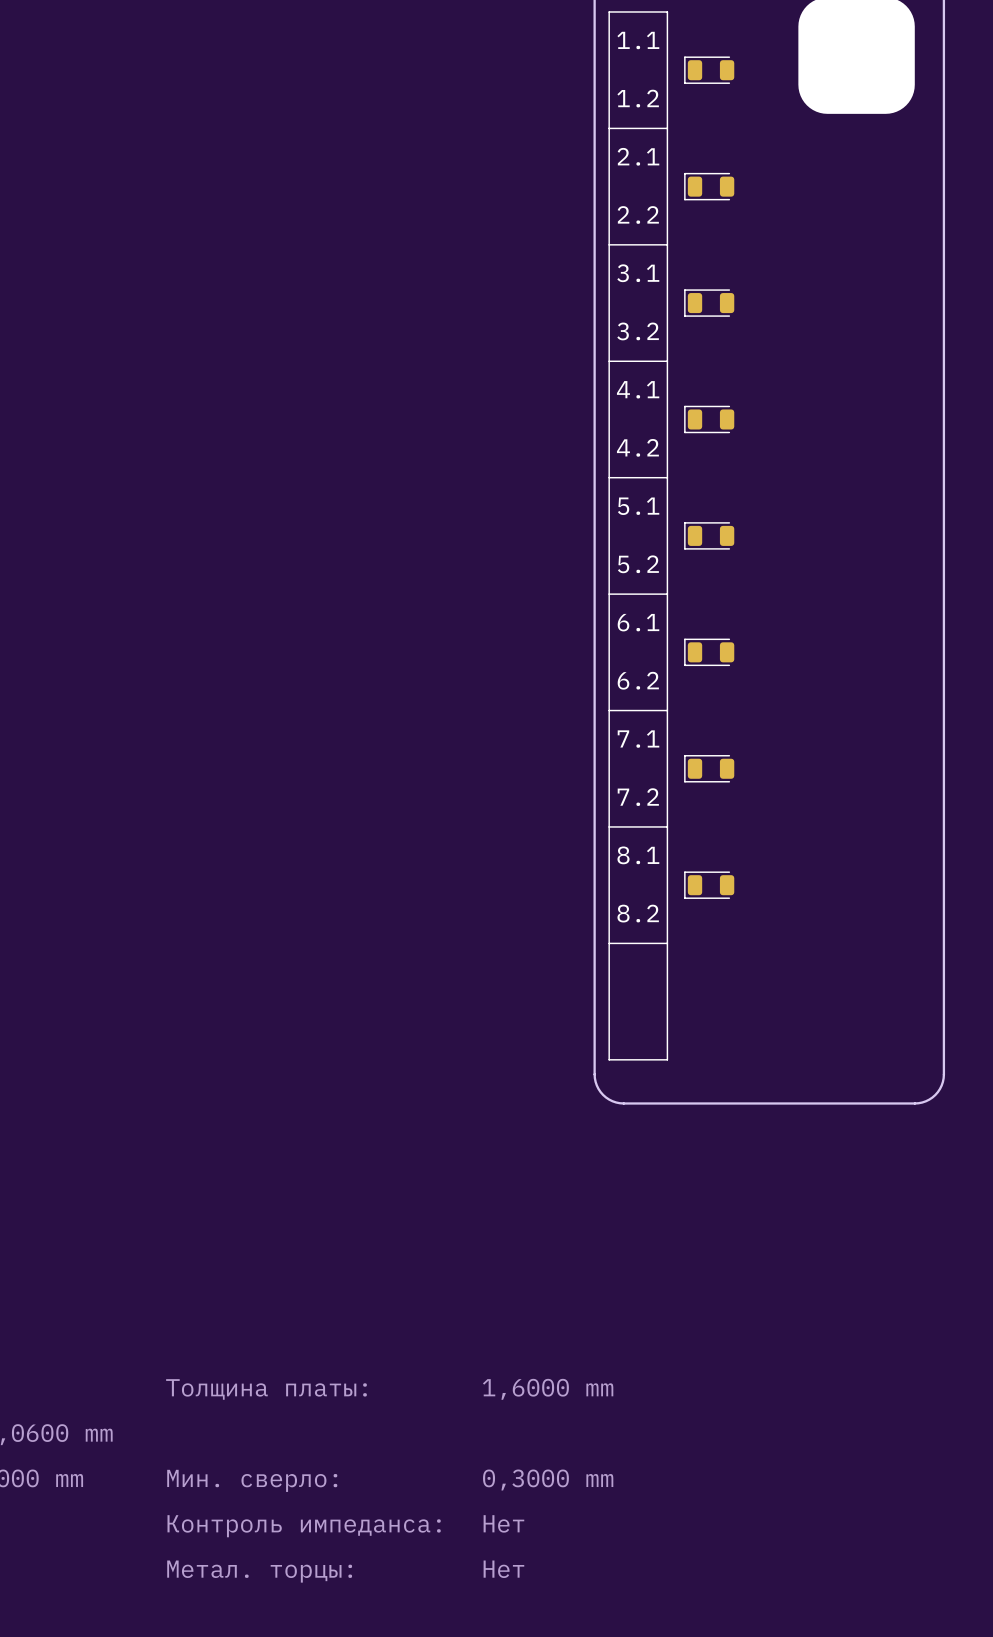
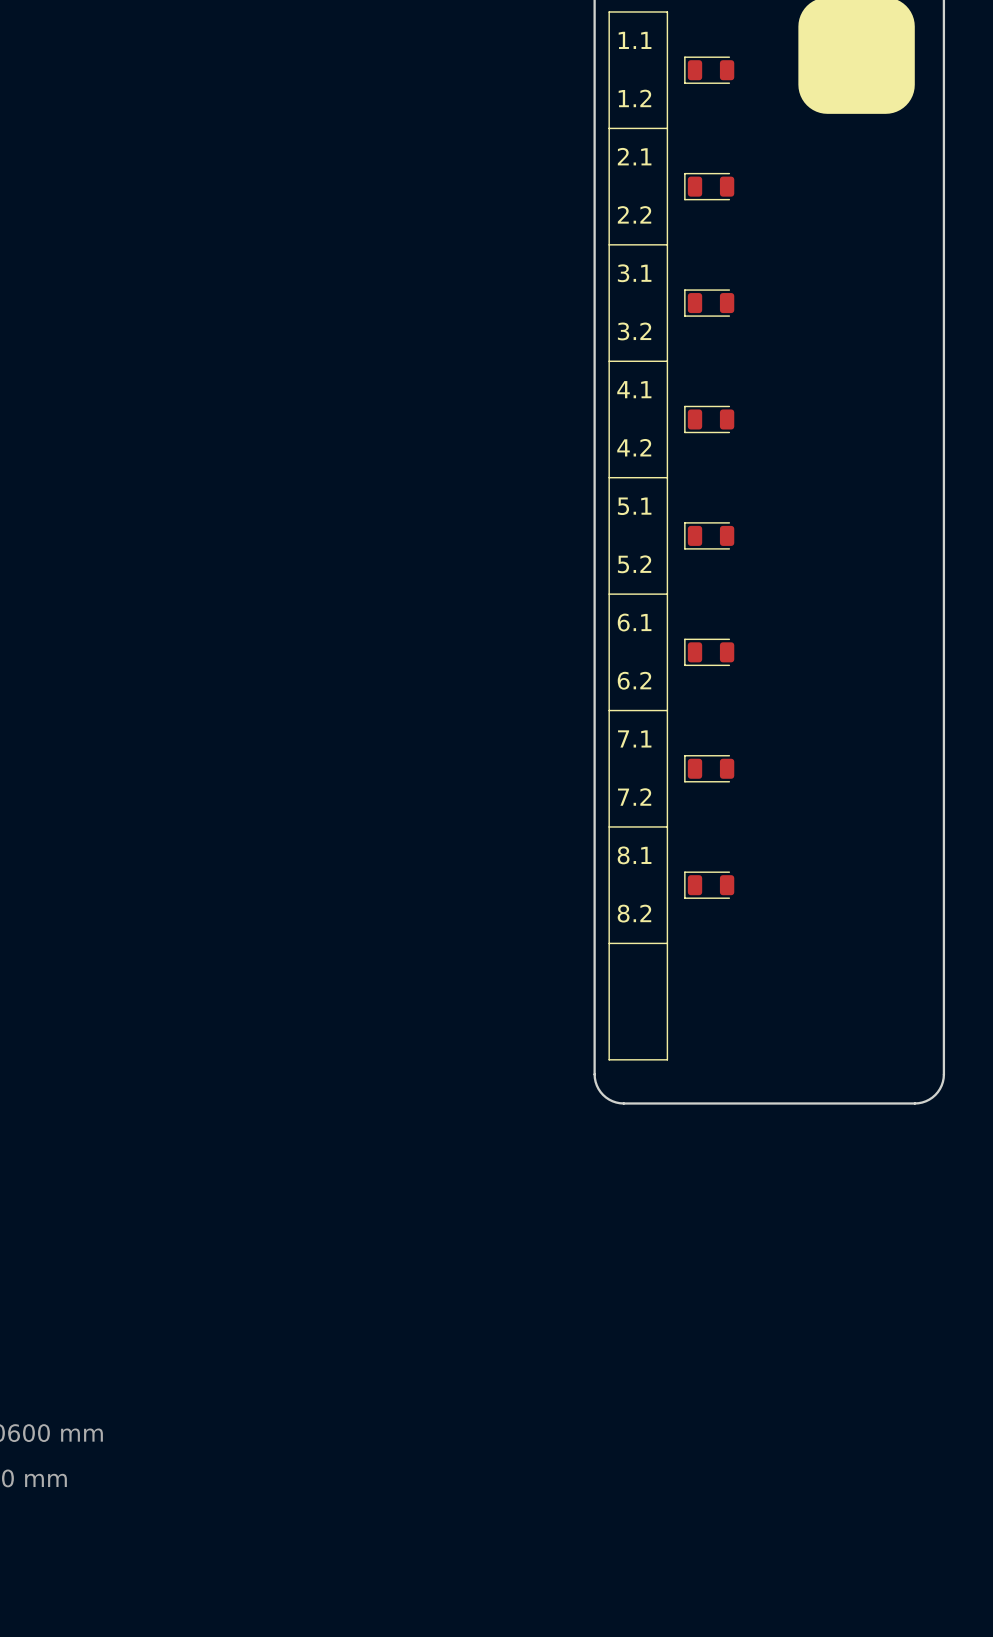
text: Толщина платы: (266, 1389) -> none
text: 1,6000 mm (548, 1389) -> none
text: Мин. сверло: (252, 1480) -> none
text: 0,3000 mm (548, 1480) -> none
text: Нет (503, 1523) -> none
text: Контроль импеданса: (304, 1526) -> none
text: Нет (503, 1569) -> none
text: Метал. торцы: (259, 1571) -> none

